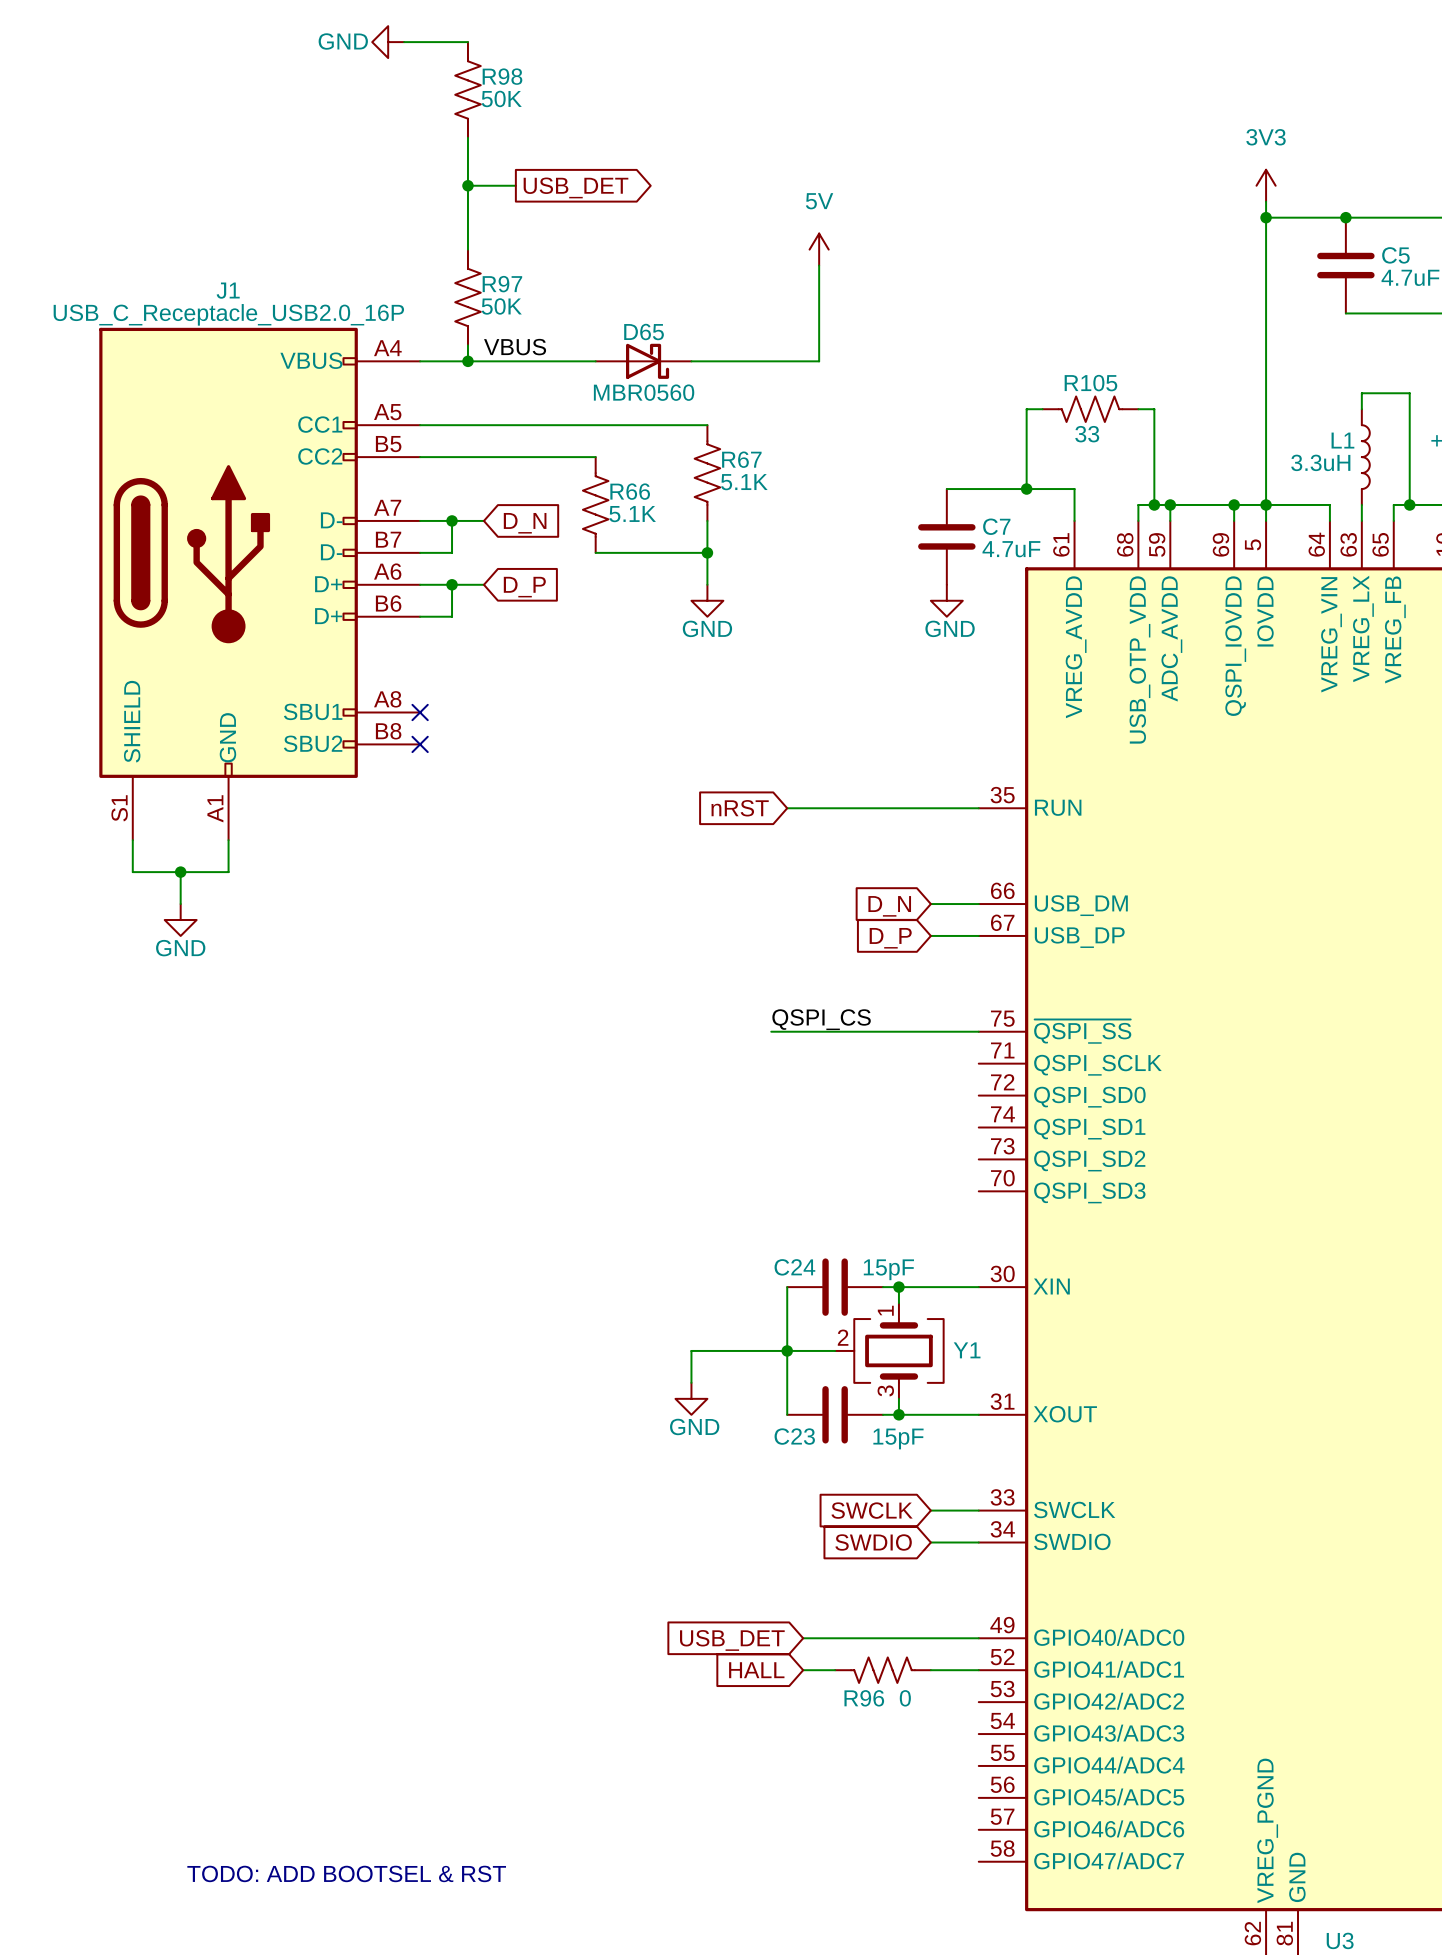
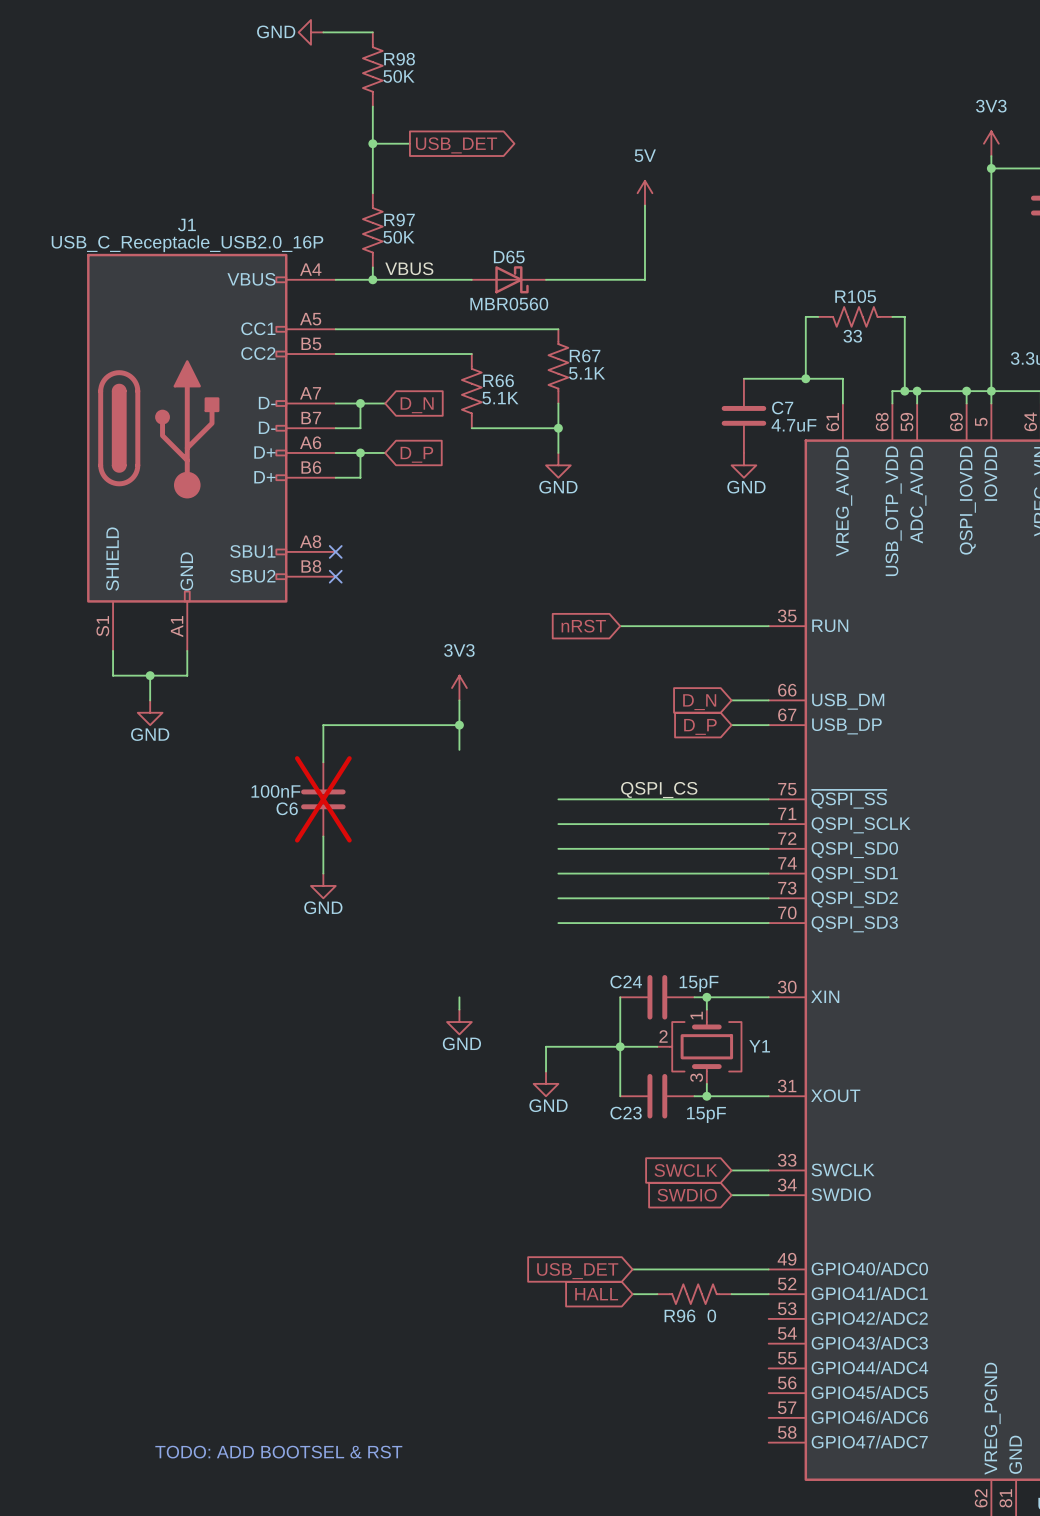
power symbol: none -> 3V3 (459, 688)
wire: none -> (459, 700) (459, 749)
wire: none -> (459, 725) (323, 725) (323, 762)
junction: none -> (459, 725)
label position: QSPI_CS (821, 1019) -> QSPI_CS (659, 790)
C6: none -> 100nF (323, 799)
wire: none -> (558, 799) (607, 799)
wire: none -> (558, 824) (768, 824)
wire: none -> (323, 836) (323, 873)
wire: none -> (558, 848) (768, 848)
wire: none -> (558, 873) (768, 873)
power symbol: none -> GND (323, 885)
wire: none -> (558, 898) (768, 898)
wire: none -> (558, 923) (768, 923)
wire: none -> (459, 997) (459, 1009)
power symbol: none -> GND (459, 1022)

